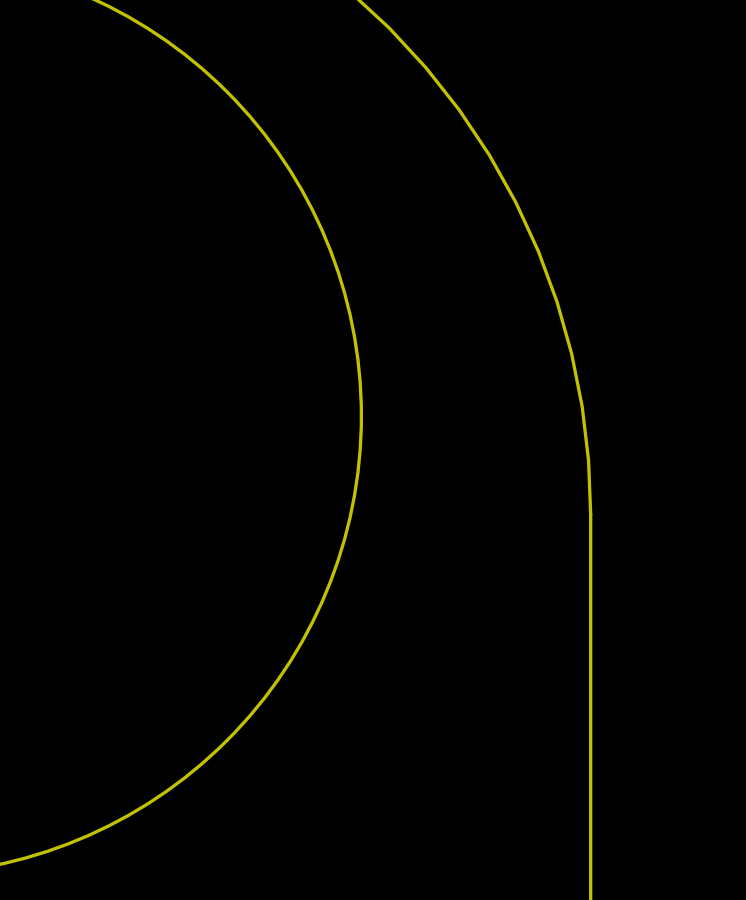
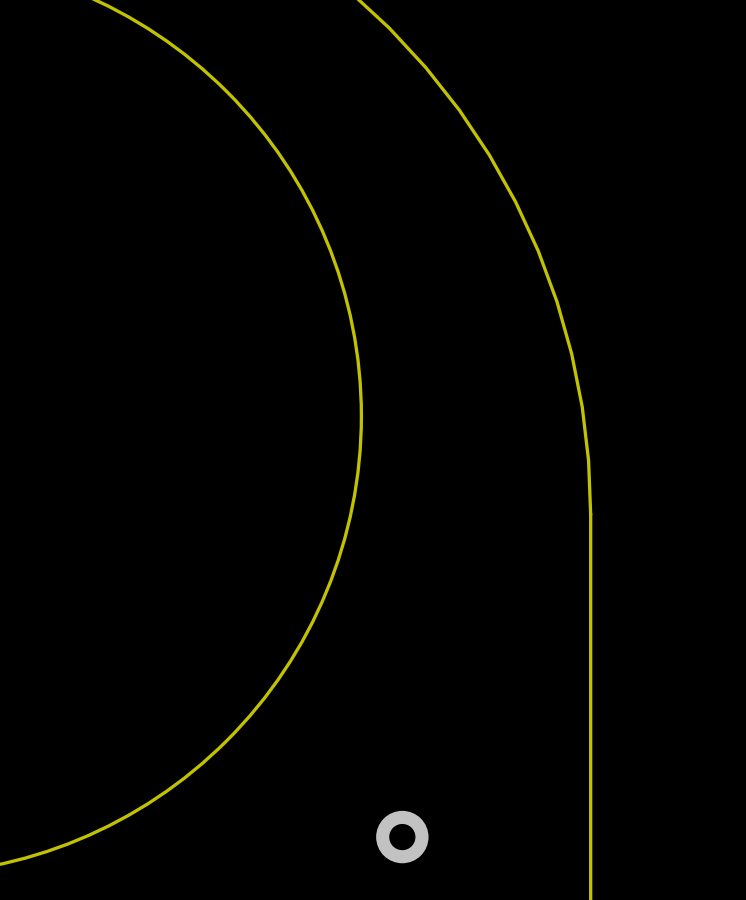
via: none -> (402, 837)

